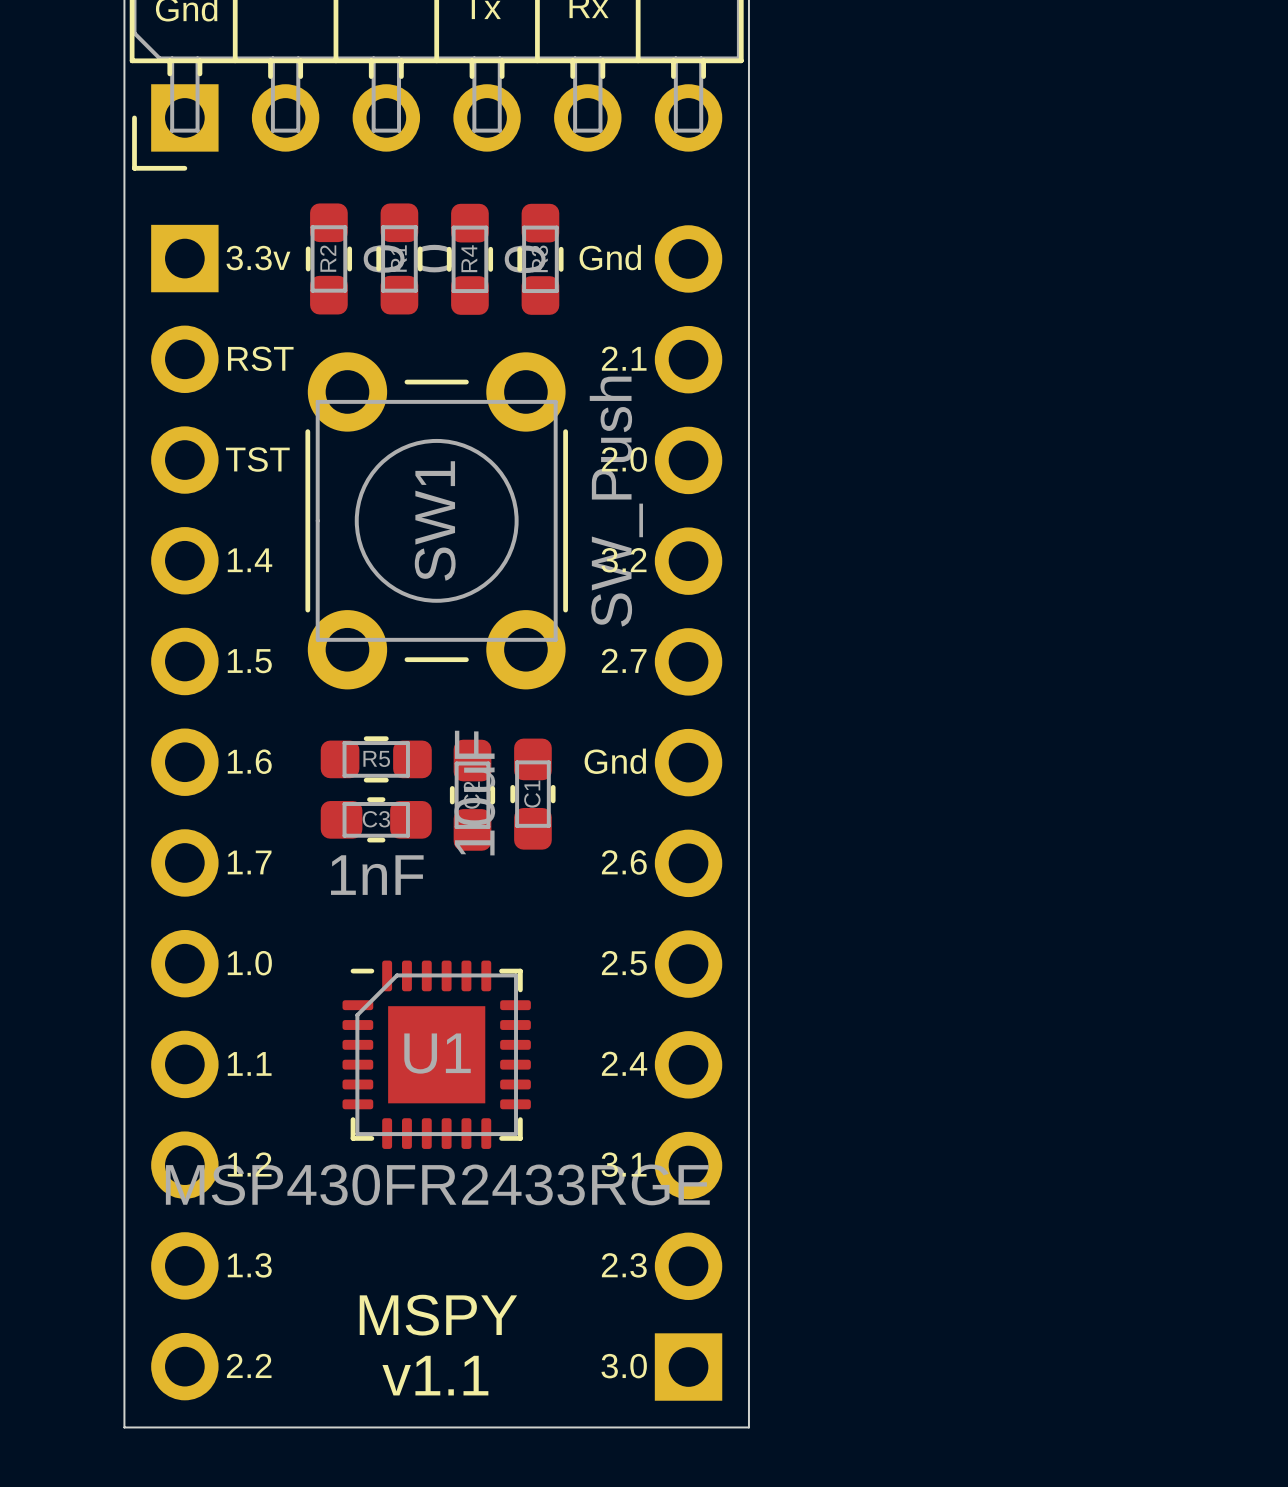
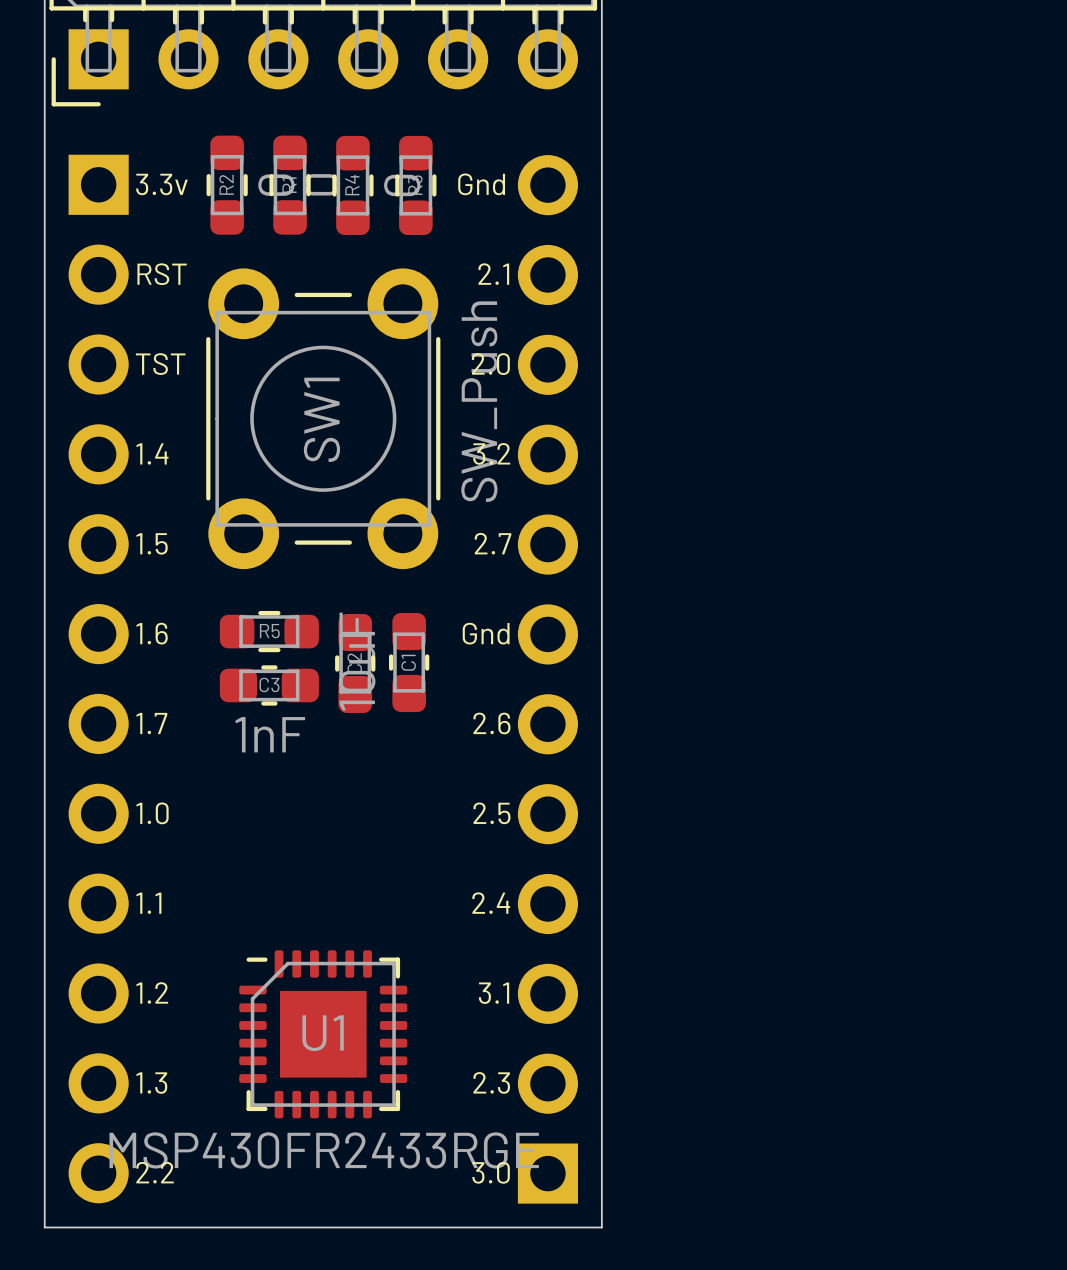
U1 position: (436, 1054) -> (323, 1034)
text: MSPY (438, 1315) -> none
text: v1.1 (435, 1375) -> none

